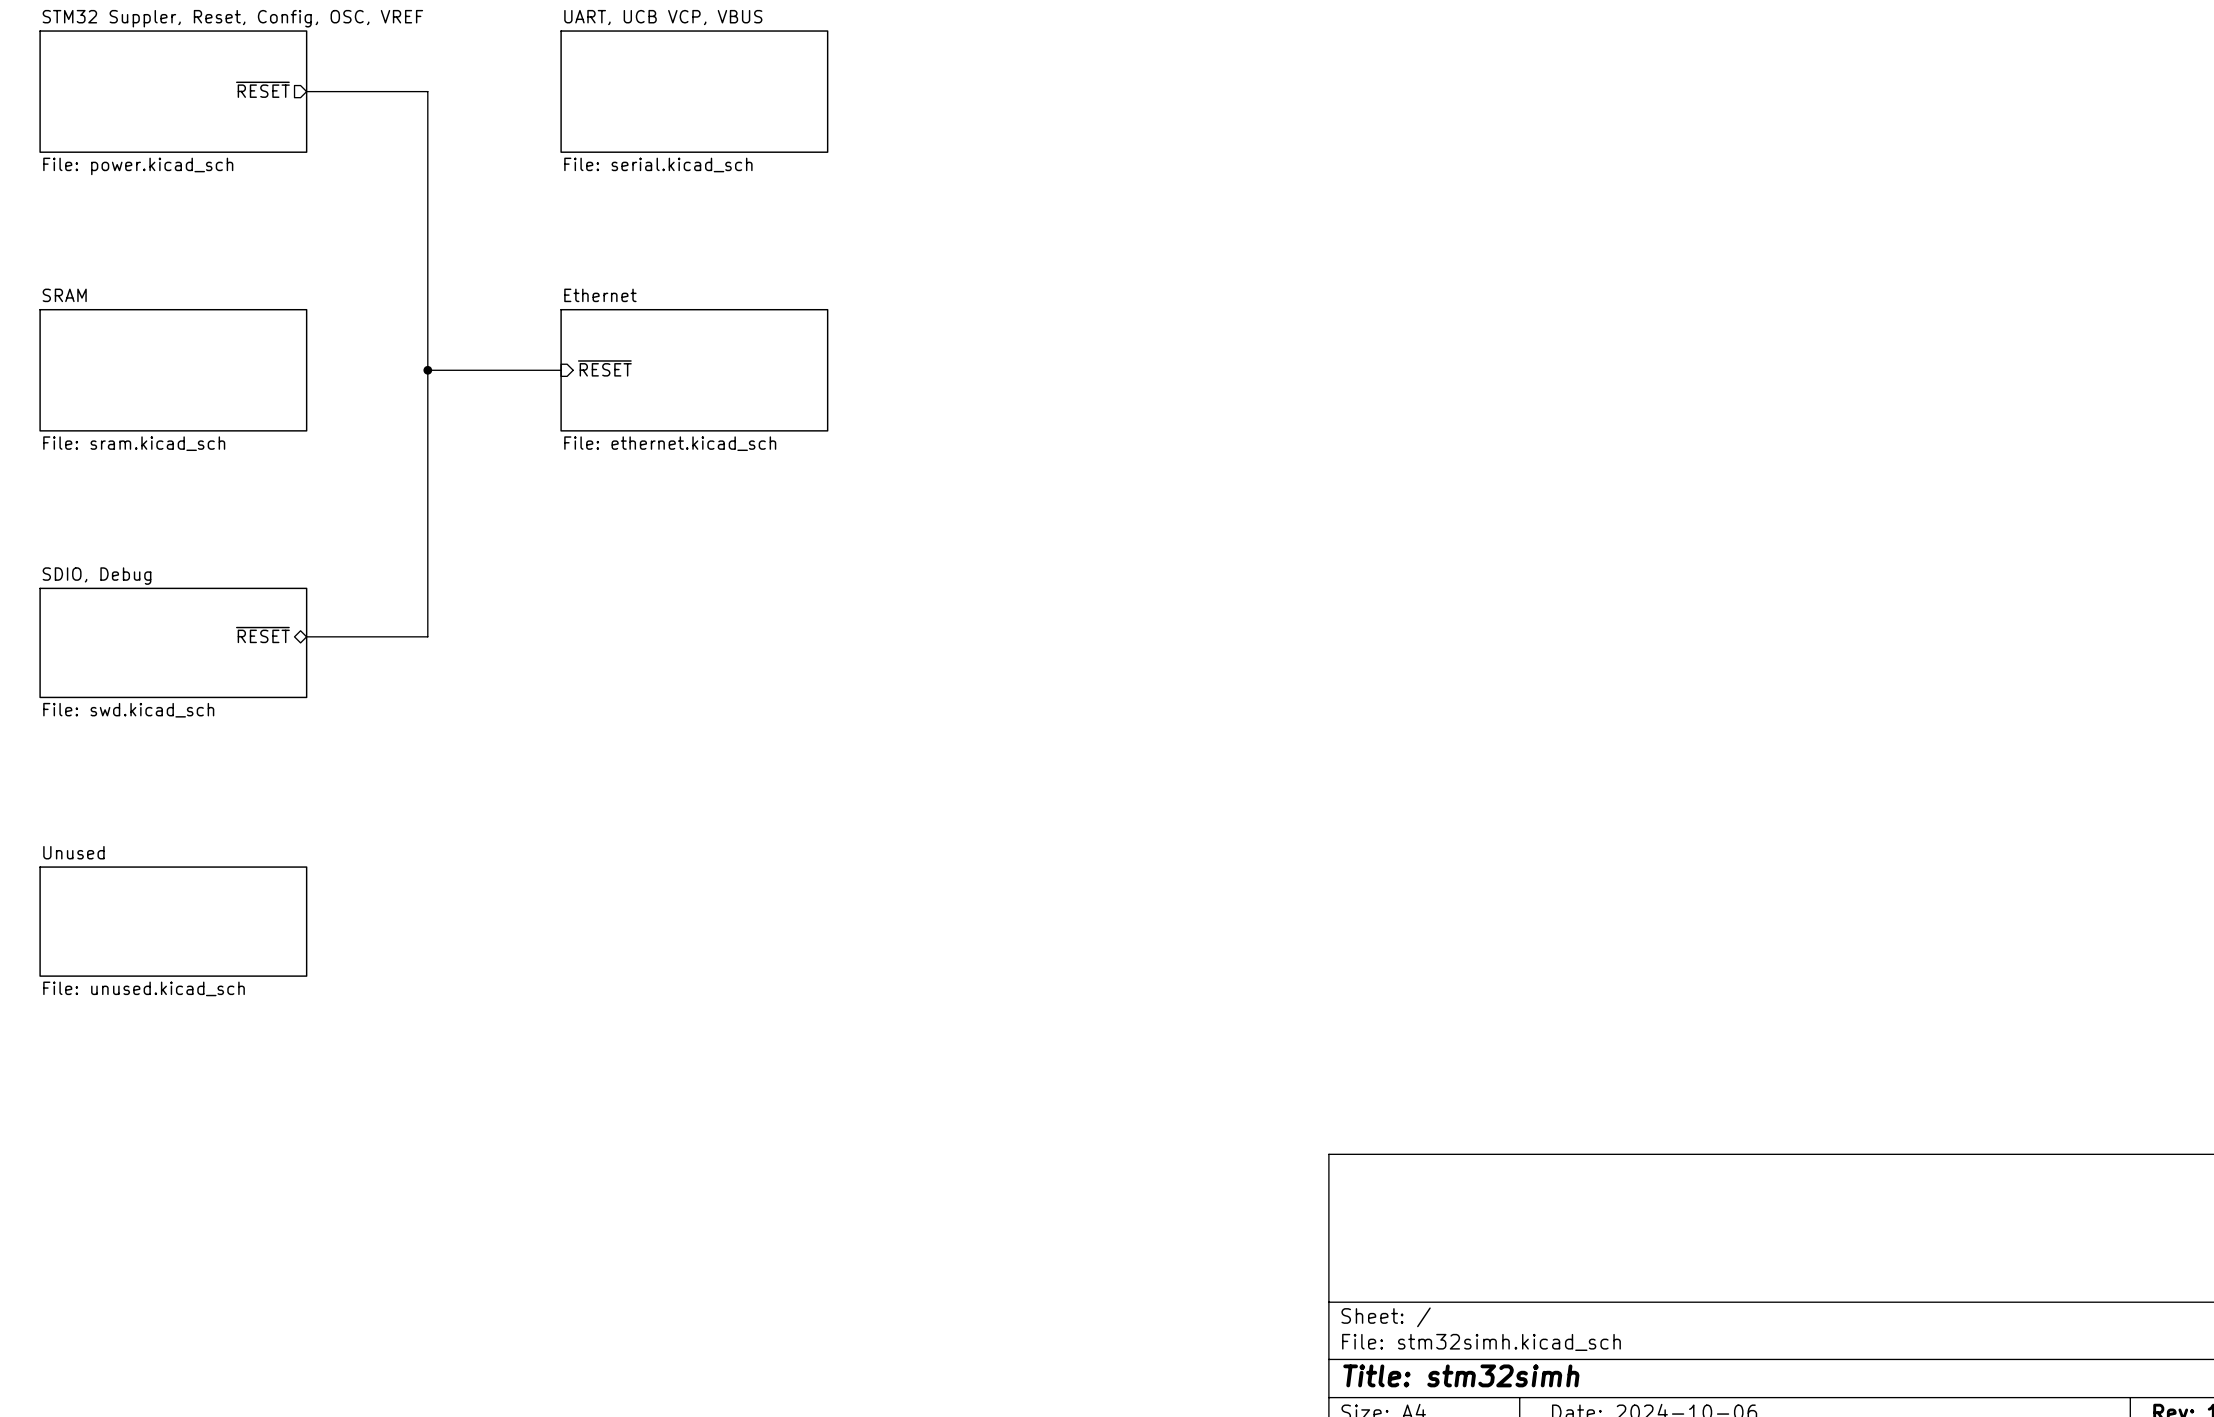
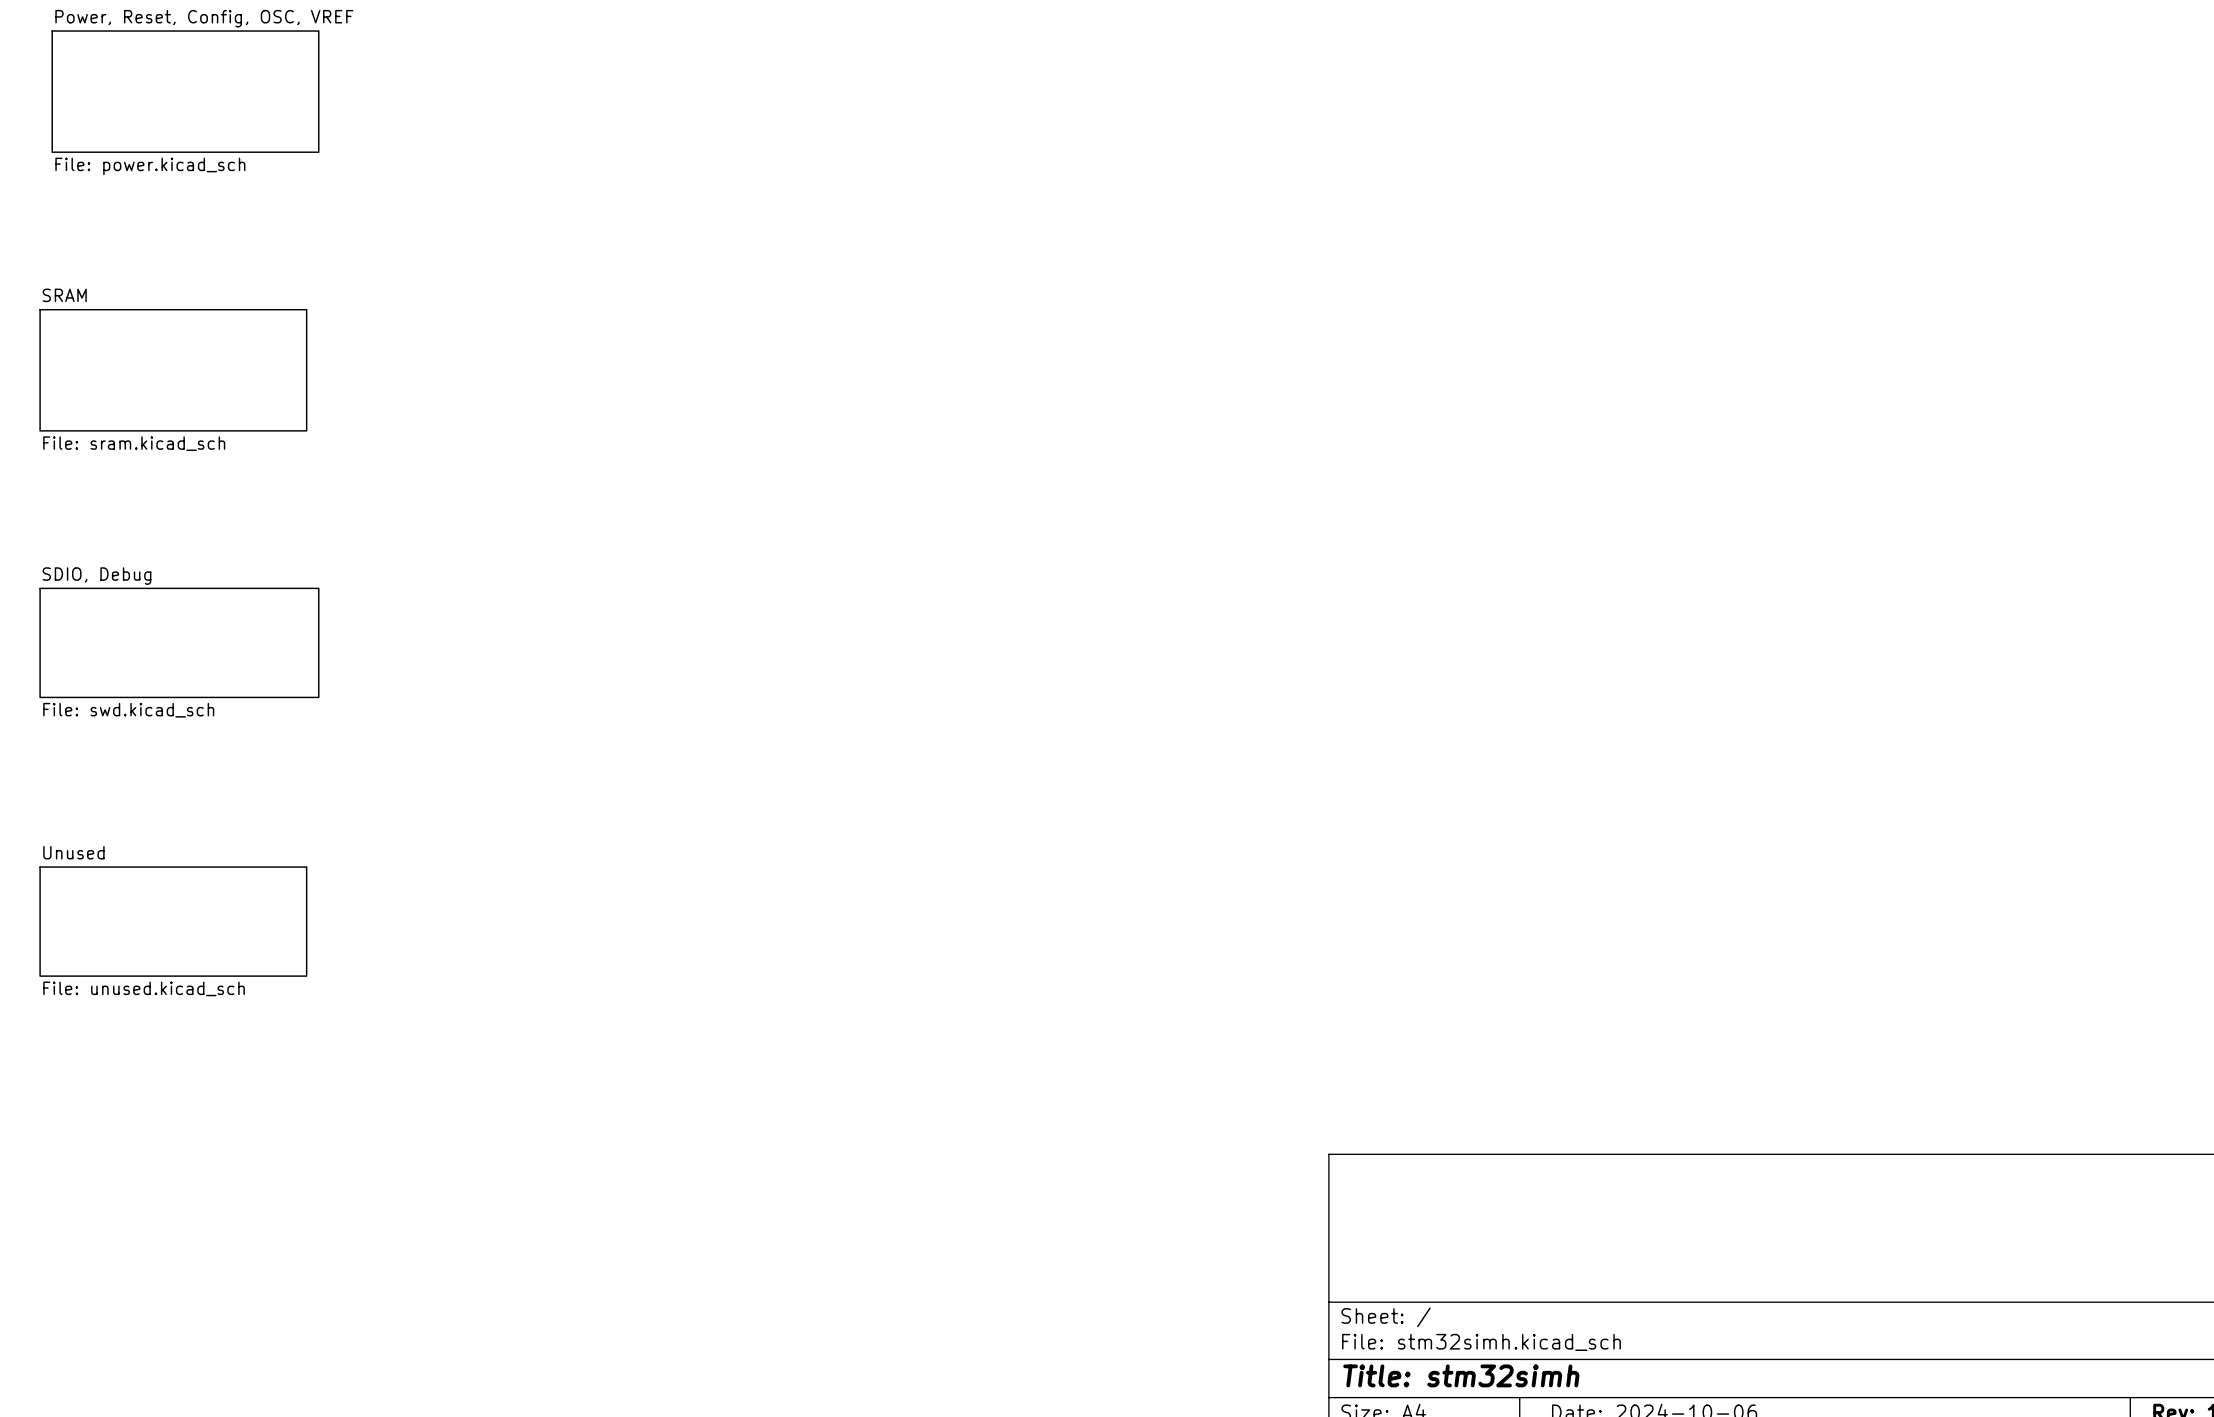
sheet pin: ~{RESET} (262, 89) -> none
sheet STM32 Suppler, Reset, Config, OSC, VREF: File: power.kicad_sch (173, 91) -> none
sheet Power, Reset, Config, OSC, VREF: none -> File: power.kicad_sch (185, 91)
wire: (306, 91) (427, 91) (427, 636) (306, 636) -> none
sheet UART, UCB VCP, VBUS: File: serial.kicad_sch (694, 91) -> none
sheet pin: ~{RESET} (604, 368) -> none
wire: (427, 370) (561, 370) -> none
junction: (427, 370) -> none
sheet Ethernet: File: ethernet.kicad_sch (694, 370) -> none
sheet SDIO, Debug shape: [39, 587, 308, 699] -> [39, 587, 320, 699]
sheet pin: ~{RESET} (262, 635) -> none

